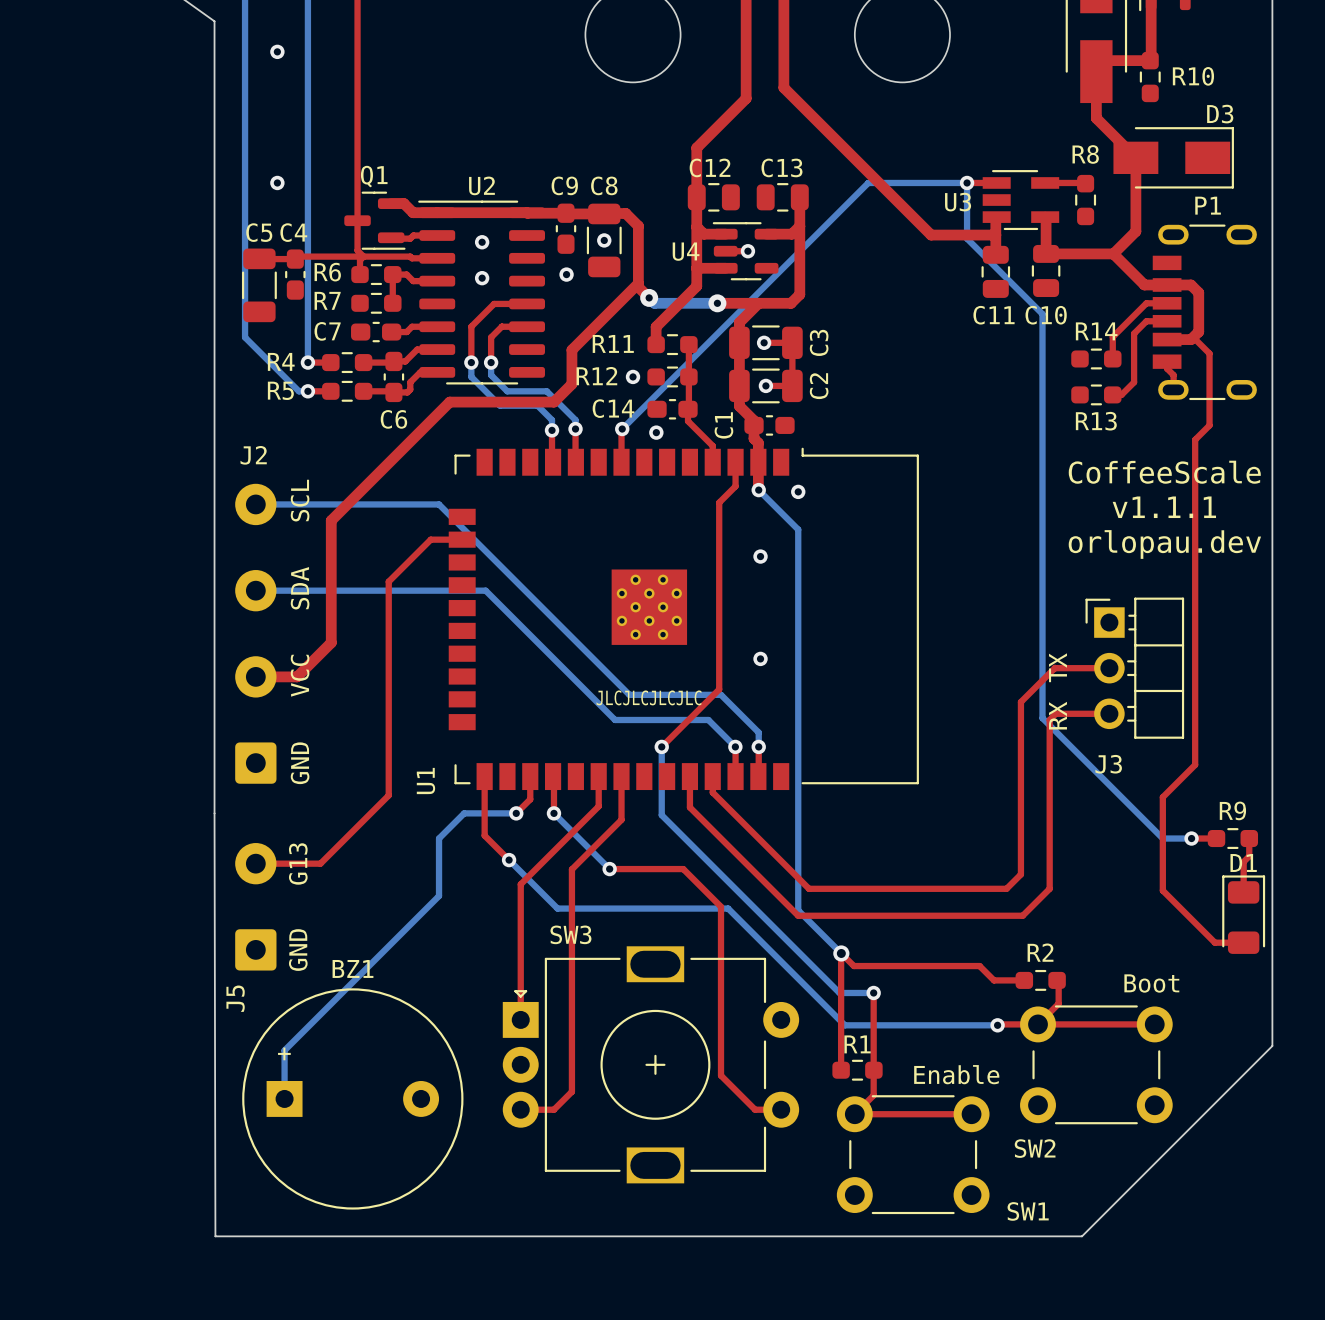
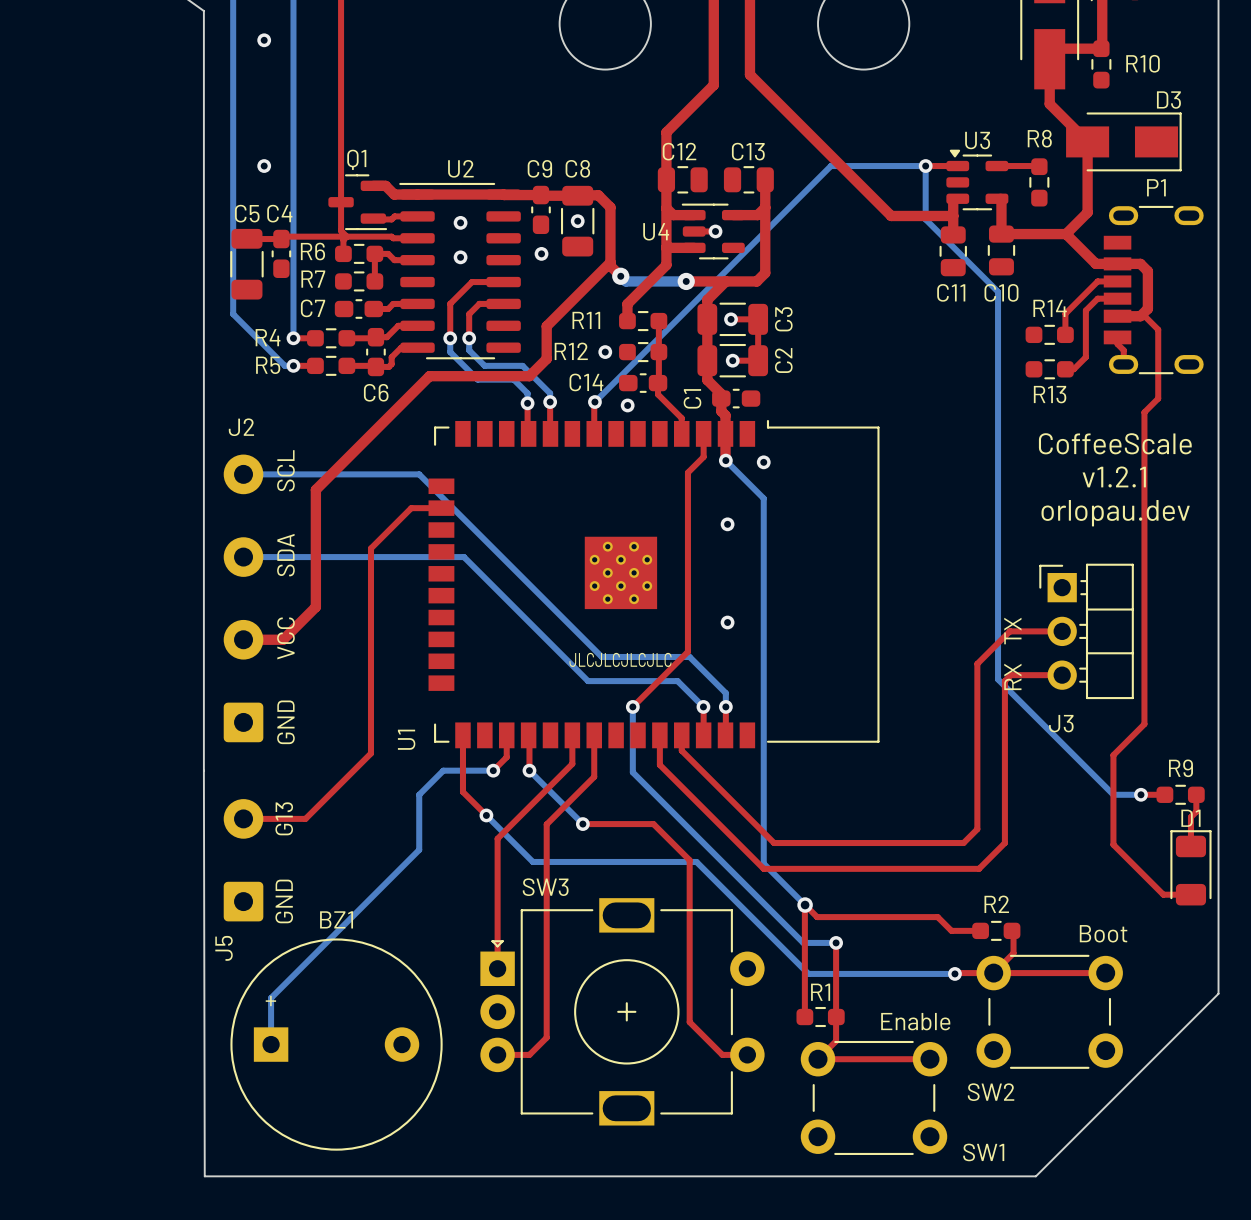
U3 footprint: [982, 170, 1060, 231] -> [946, 149, 1009, 211]
U3 name position: U3 (958, 202) -> U3 (977, 140)
text: v1.1.1 (1164, 507) -> v1.2.1 (1114, 476)

